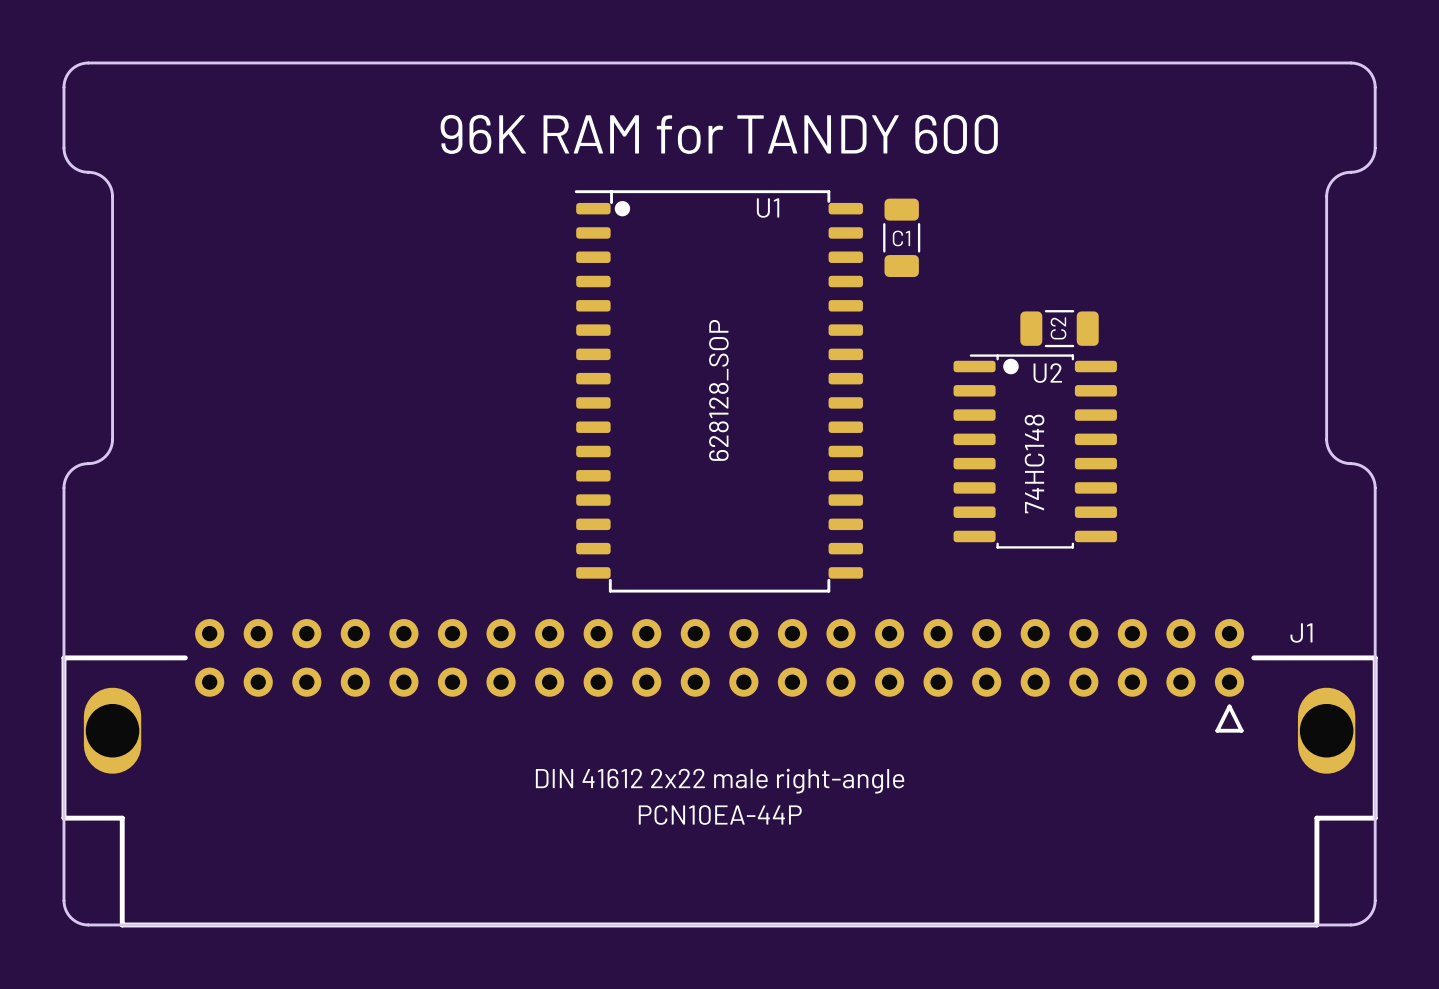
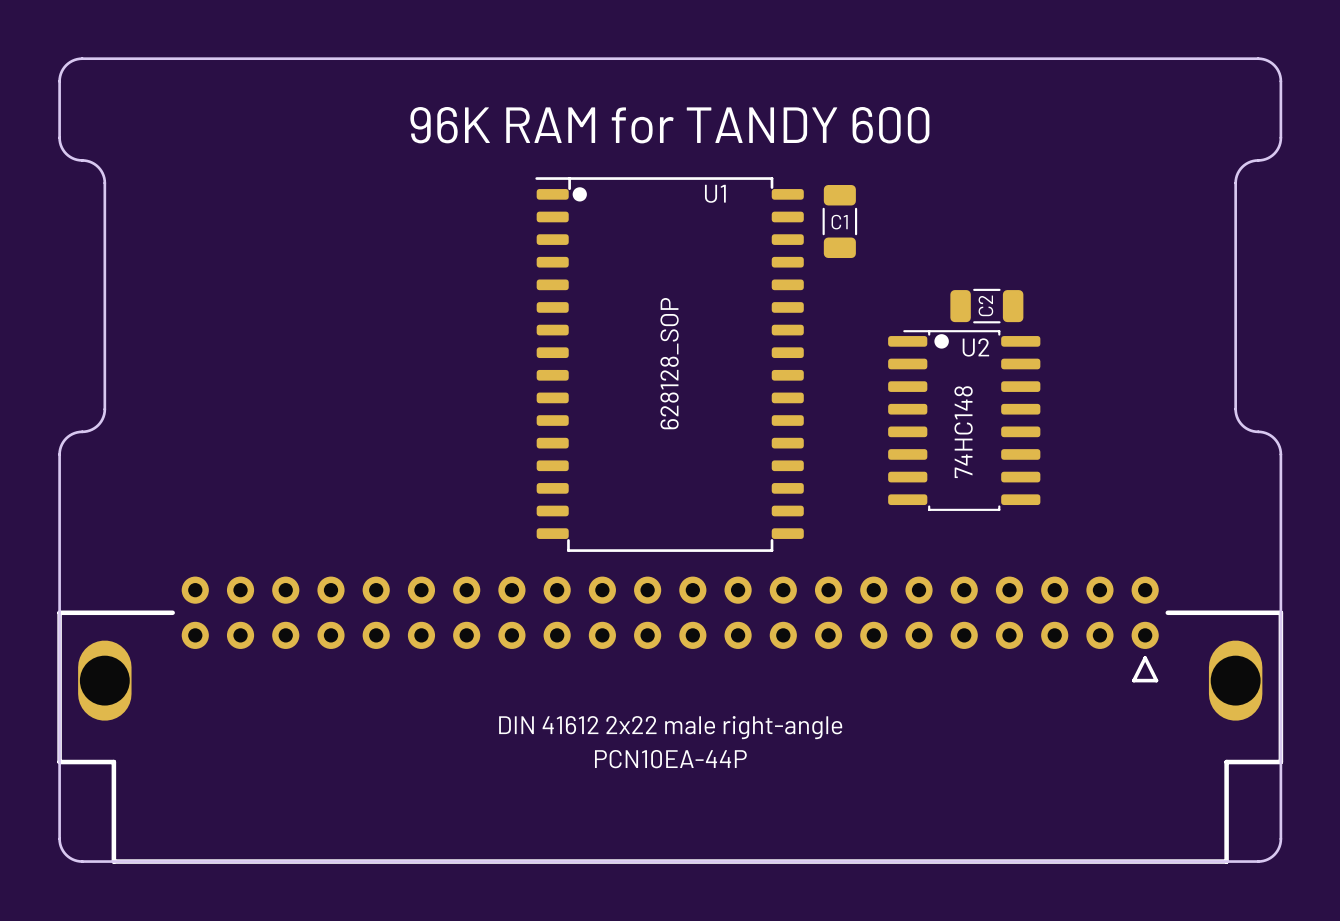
J1 name: J1 (1301, 633) -> none

